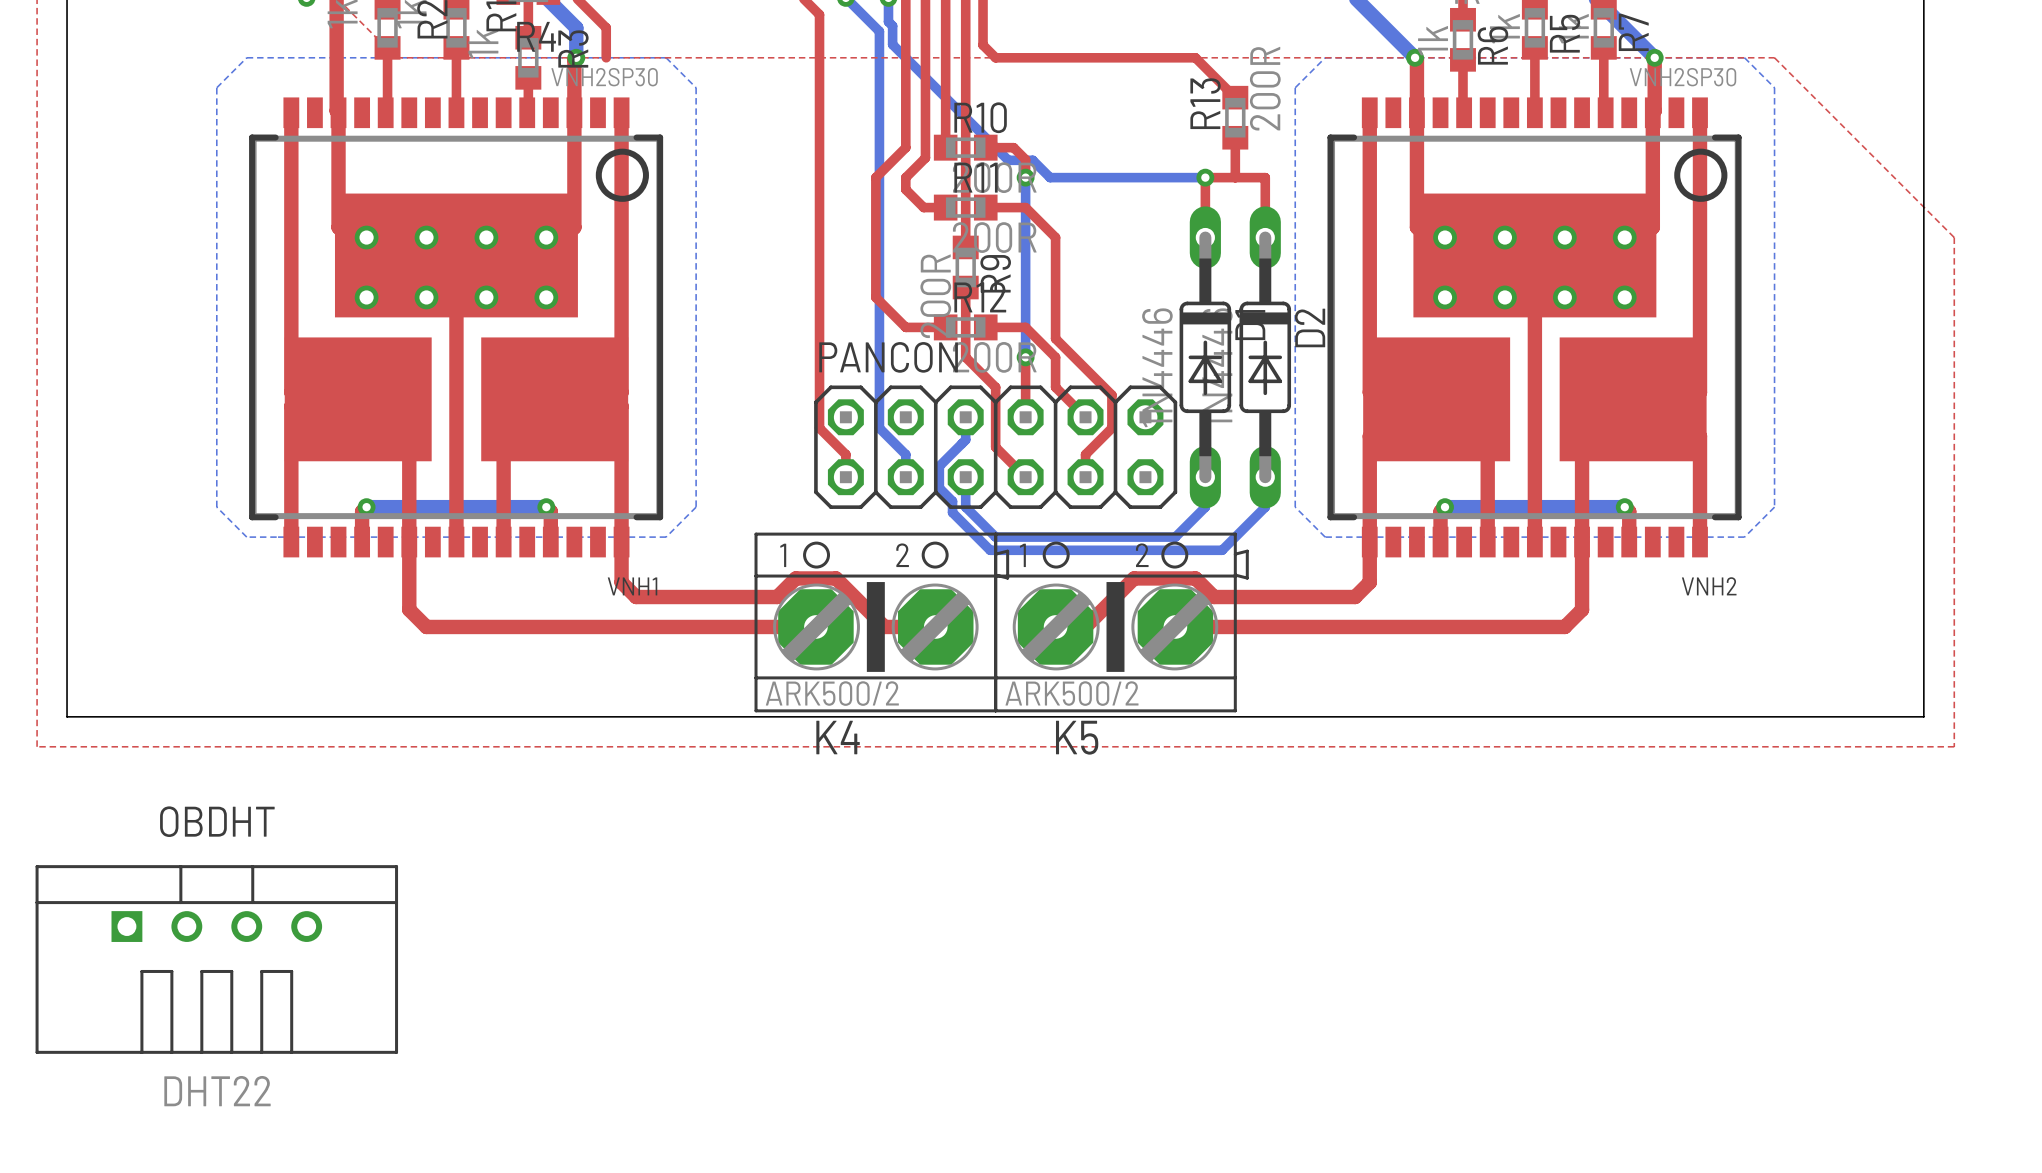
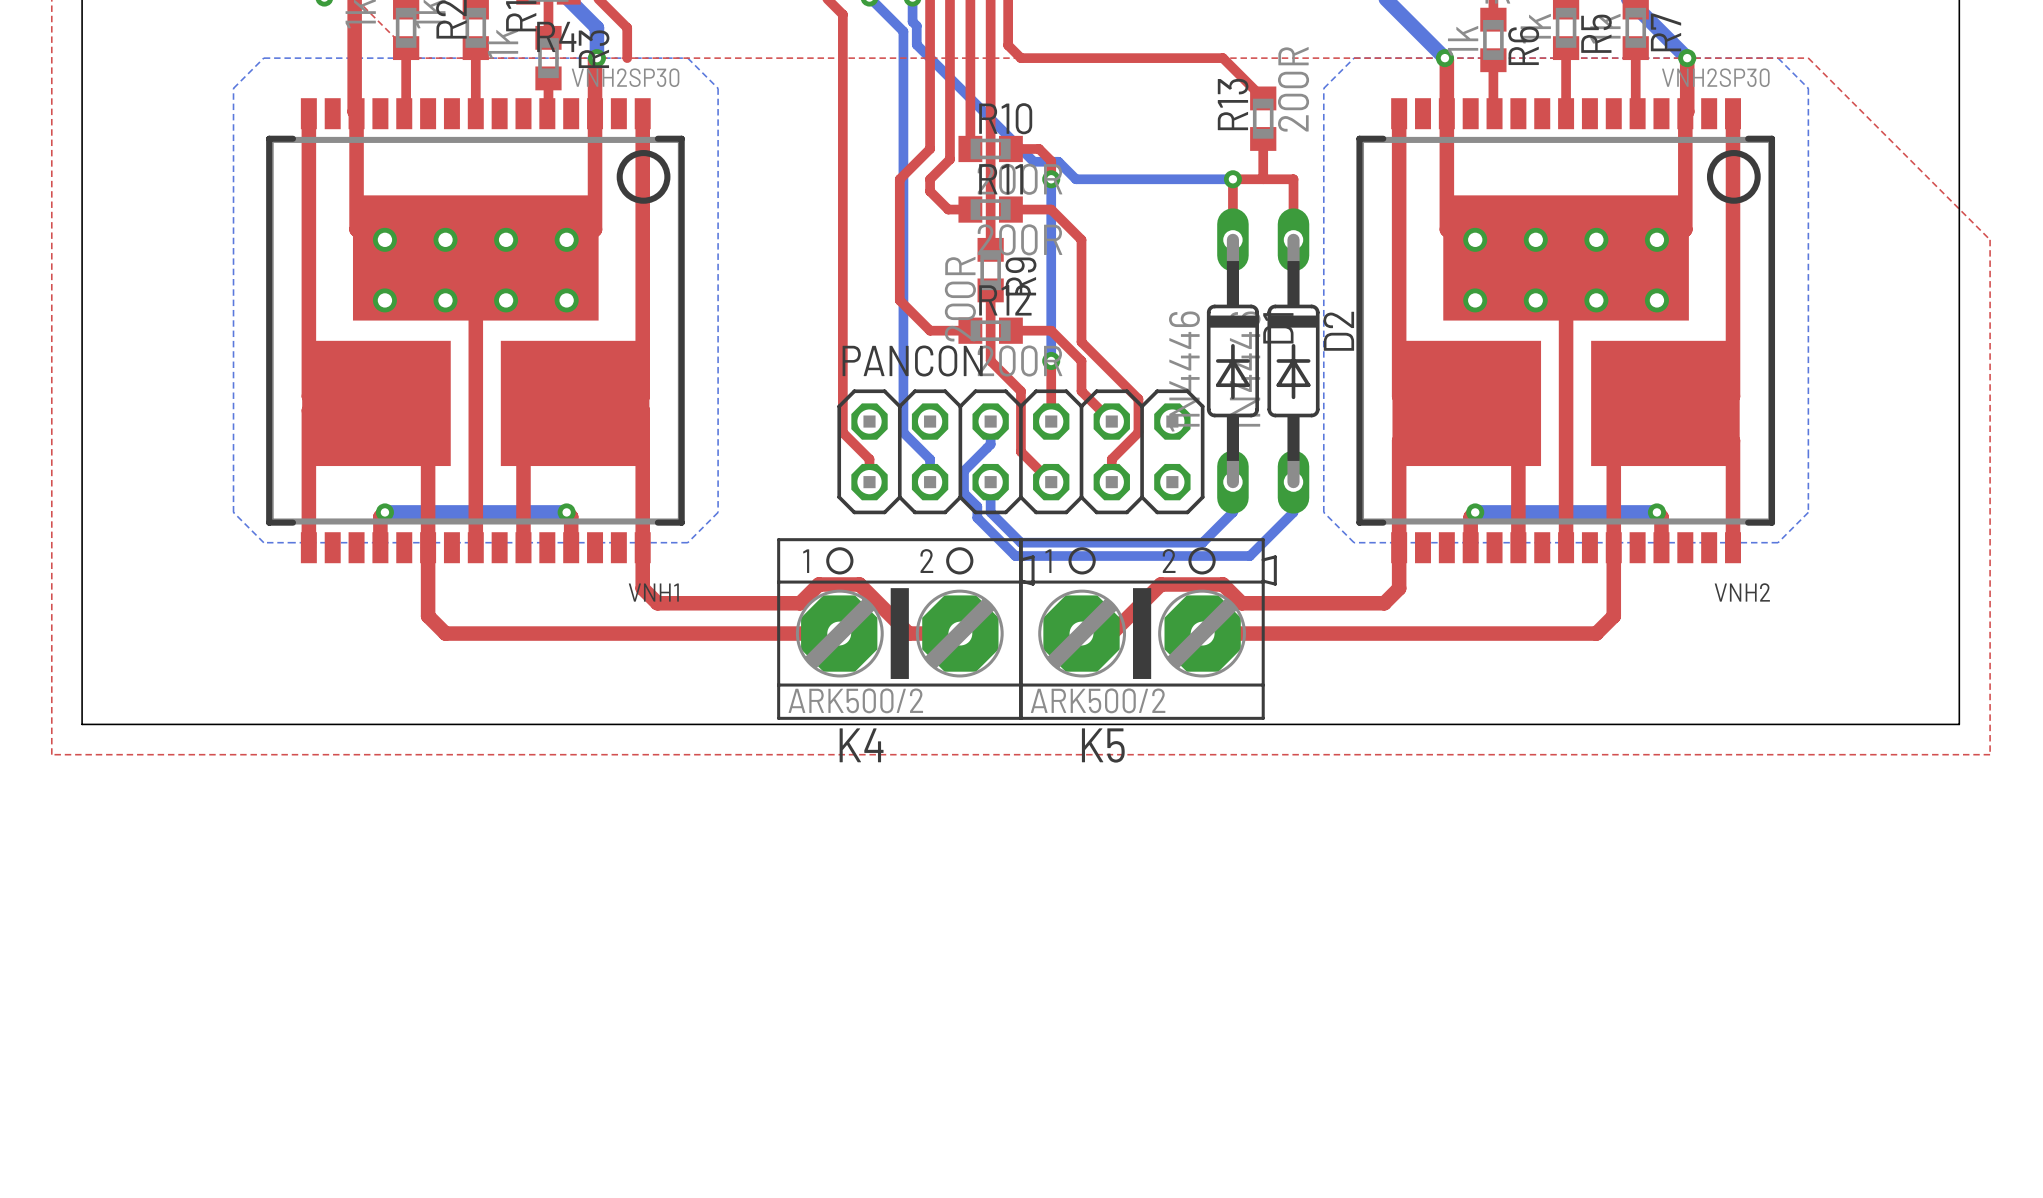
OBDHT: DHT22 (216, 959) -> none

